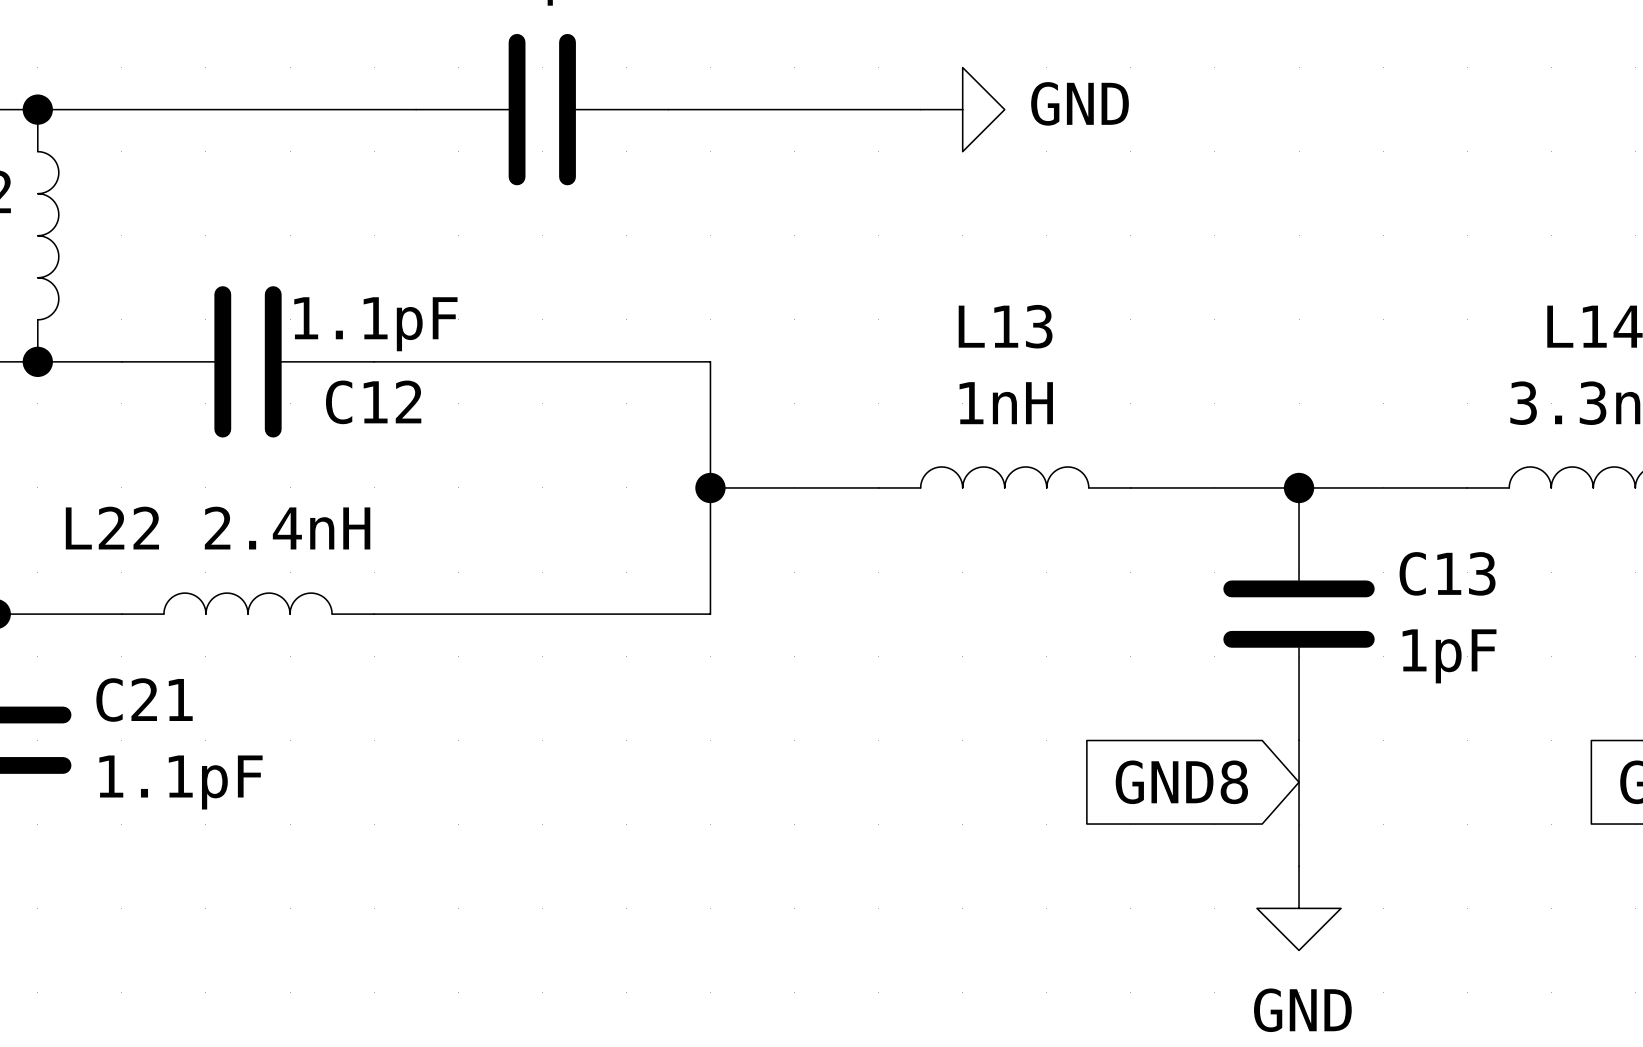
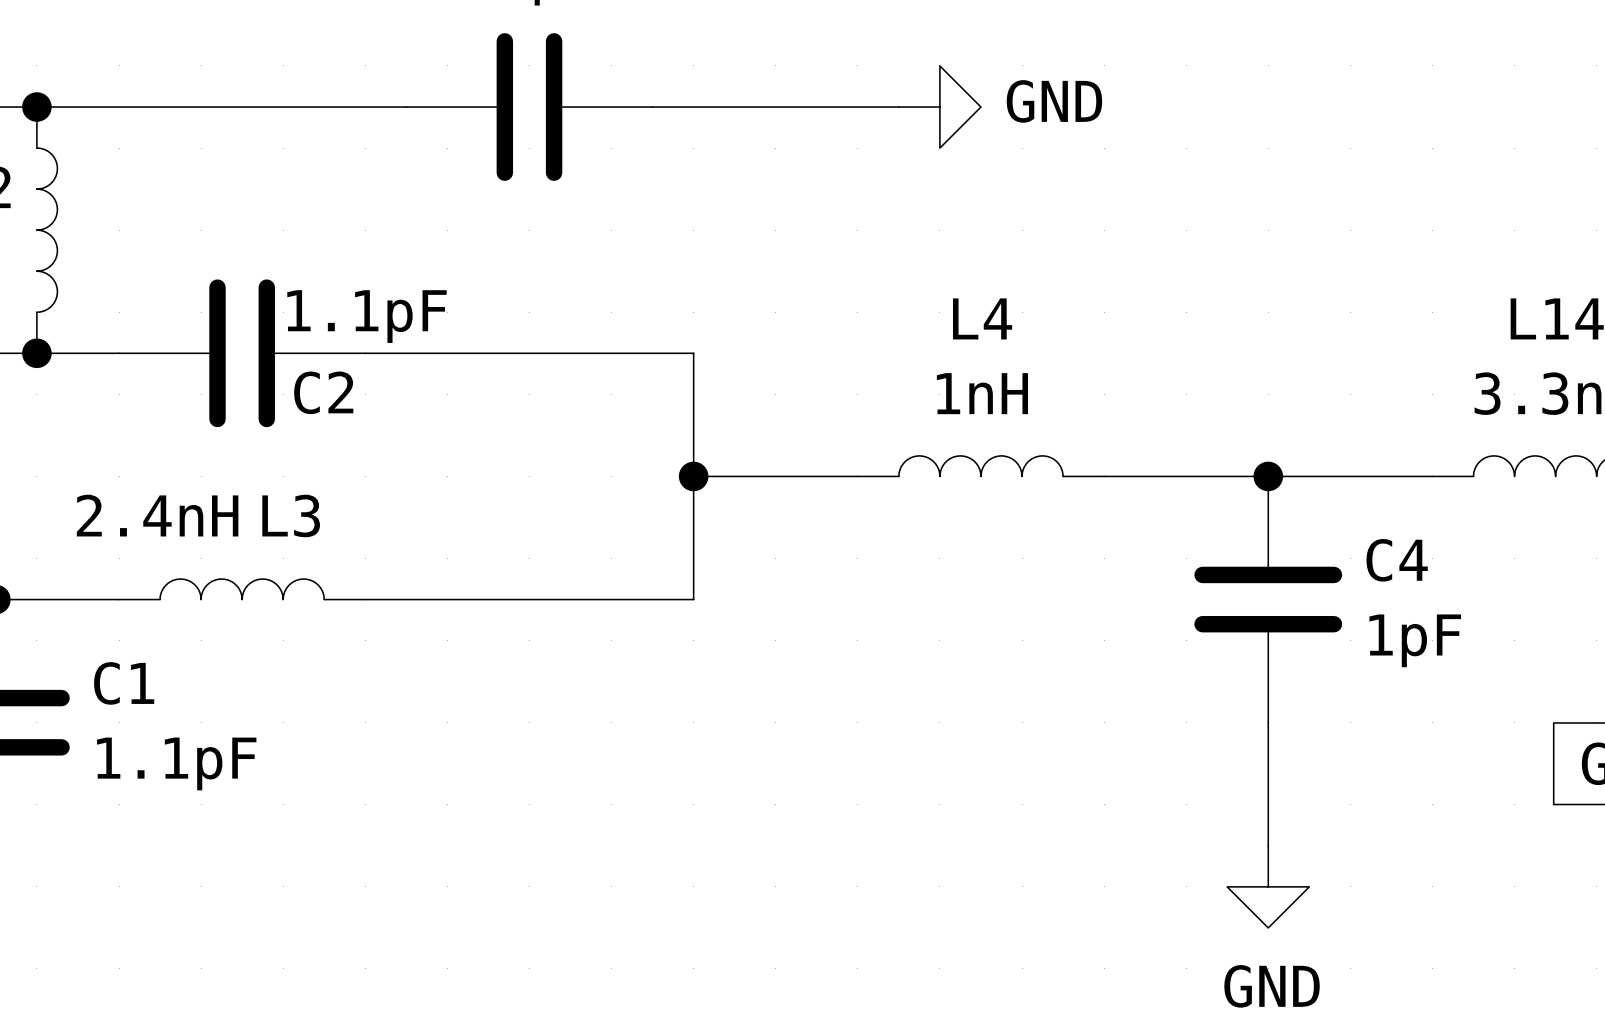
L13 name: L13 (1005, 326) -> L4 (982, 318)
C12 name: C12 (373, 402) -> C2 (323, 392)
L22 name: L22 (112, 528) -> L3 (291, 515)
L22 value position: 2.4nH (287, 528) -> 2.4nH (157, 515)
C13 name: C13 (1447, 573) -> C4 (1397, 560)
C21 name: C21 (144, 700) -> C1 (124, 683)
global label: GND8 (1181, 782) -> none

